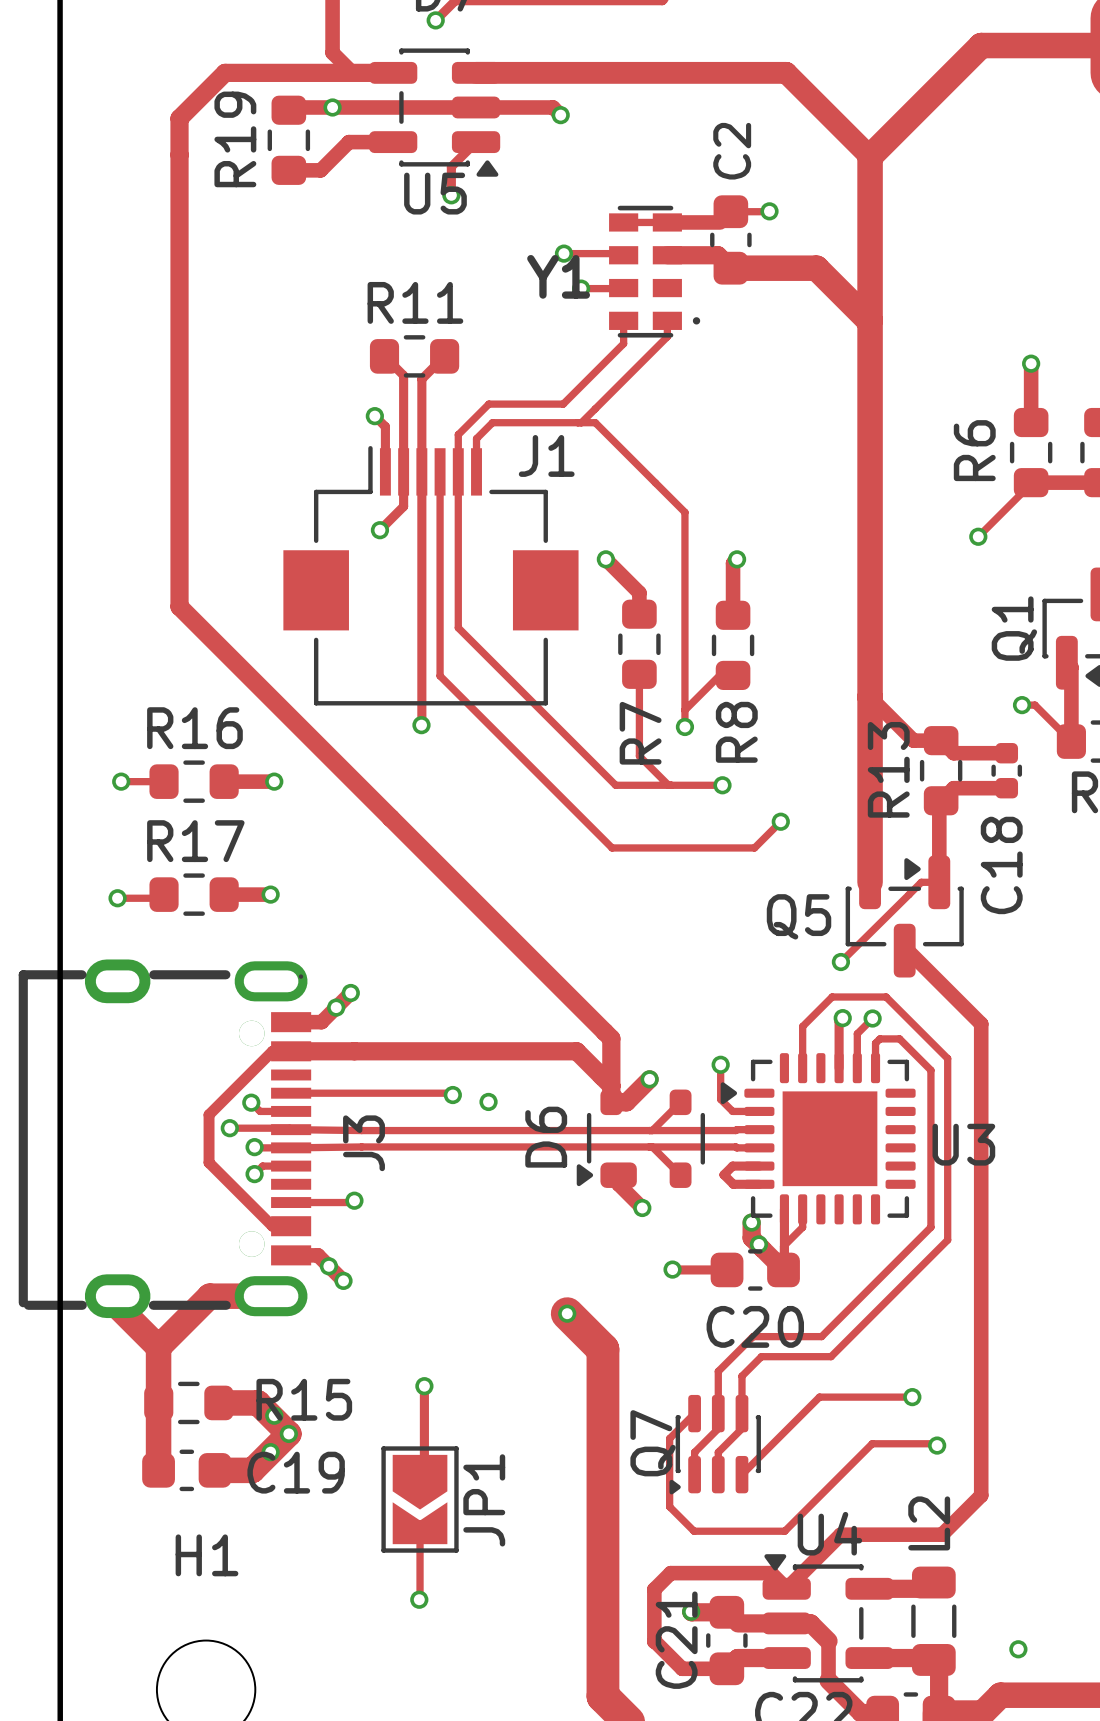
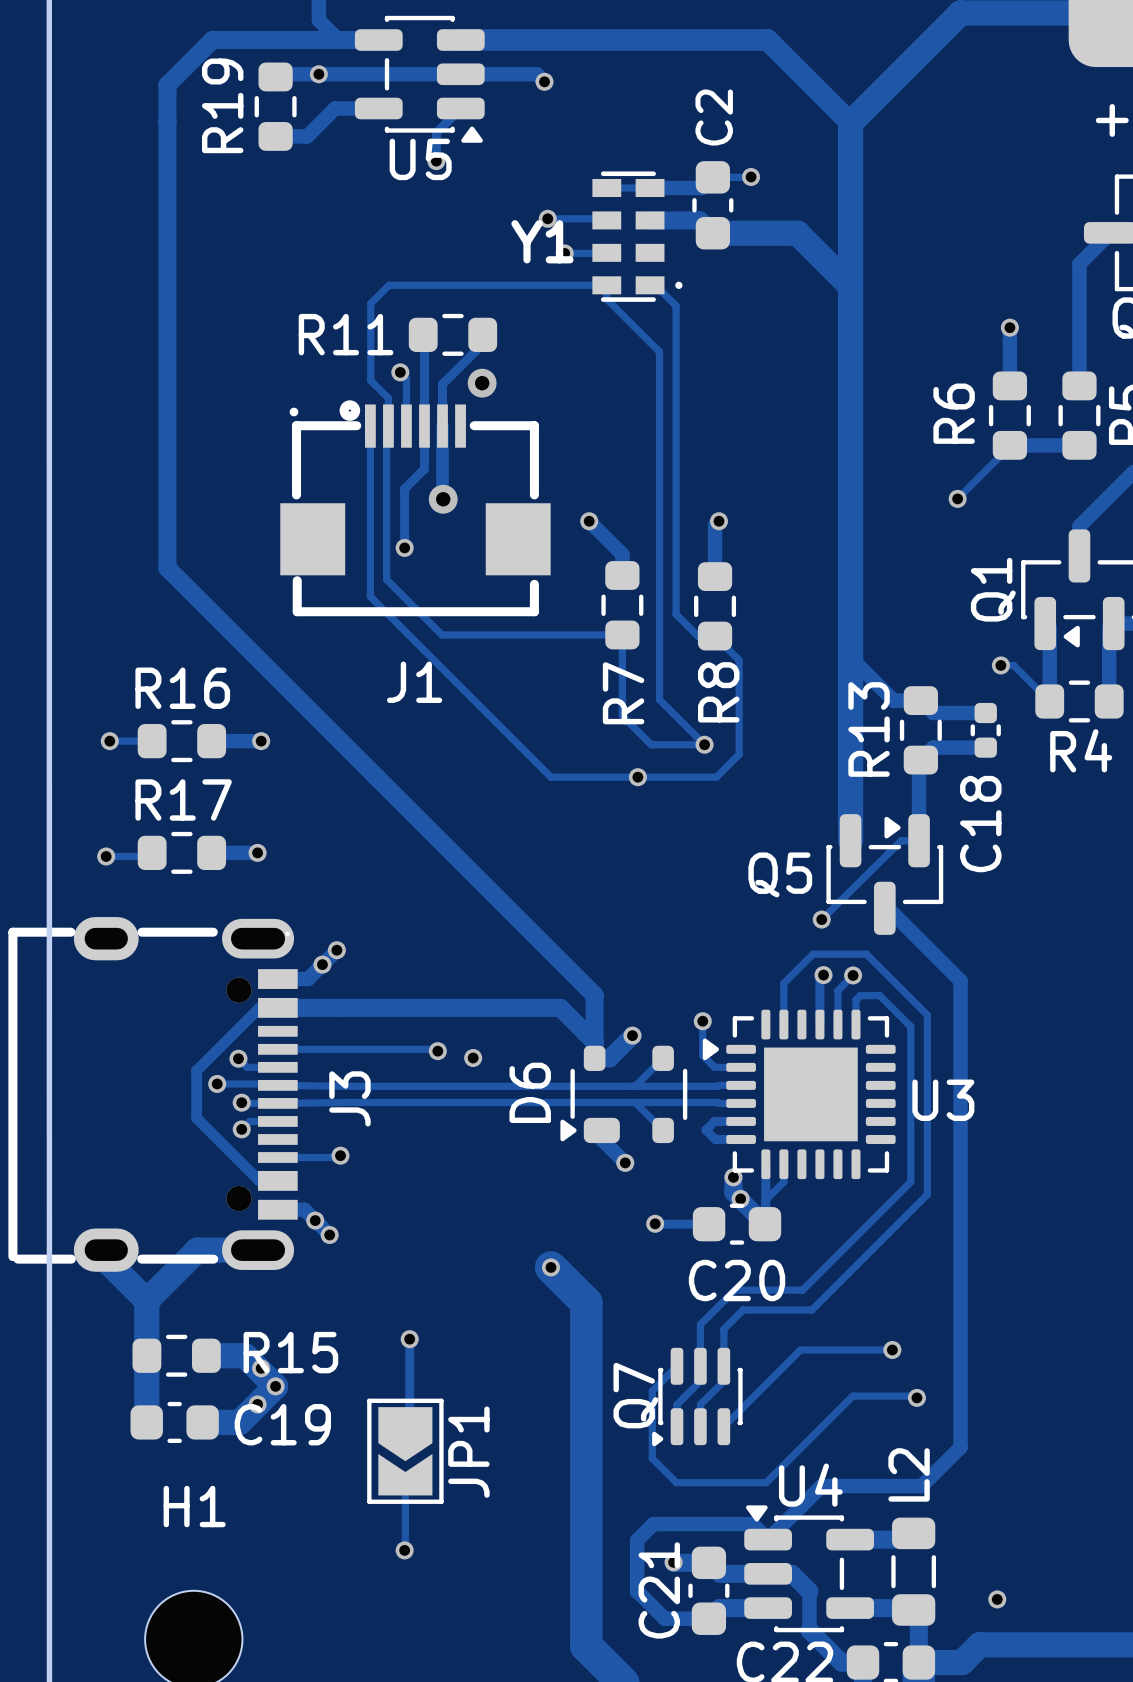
R11 name position: R11 (415, 302) -> R11 (346, 334)
track: none -> (606, 285) (388, 285) (370, 303) (370, 380) (388, 398) (388, 426) (386, 427) (386, 579) (441, 634) (622, 634)
track: (667, 320) (667, 336) (581, 422) -> (650, 285) (655, 285) (676, 305) (676, 614) (697, 636) (701, 636)
track: (623, 334) (623, 343) (563, 404) (488, 404) (458, 434) (458, 627) (615, 785) (668, 785) -> (606, 299) (659, 351) (659, 699) (704, 744)
track: (384, 356) (403, 375) (403, 506) (379, 530) -> none
R11 position: (414, 356) -> (452, 334)
track: (444, 356) (421, 379) (421, 724) -> none
track: none -> (423, 334) (424, 468) (404, 488) (404, 547)
track: none -> (482, 334) (482, 344) (442, 384) (443, 499)
track: none -> (400, 372) (406, 378) (406, 426)
track: (374, 416) (385, 426) (385, 471) -> none
via position: (374, 416) -> (400, 372)
via: none -> (482, 383)
J1 footprint: [283, 446, 579, 706] -> [280, 400, 551, 617]
J1 name position: J1 (546, 455) -> J1 (414, 682)
track: none -> (370, 426) (370, 596) (551, 777) (716, 777) (739, 754) (739, 660) (715, 636)
track: (440, 471) (440, 675) (612, 847) (754, 847) (780, 821) -> none
track: (476, 471) (476, 438) (492, 422) (595, 422) (684, 512) (684, 726) -> none
via: (379, 530) -> none
via: none -> (443, 499)
via: none -> (404, 547)
track: (719, 675) (684, 710) -> none
via: (421, 725) -> none
via: (684, 726) -> none
via: none -> (637, 777)
via: (780, 821) -> none

